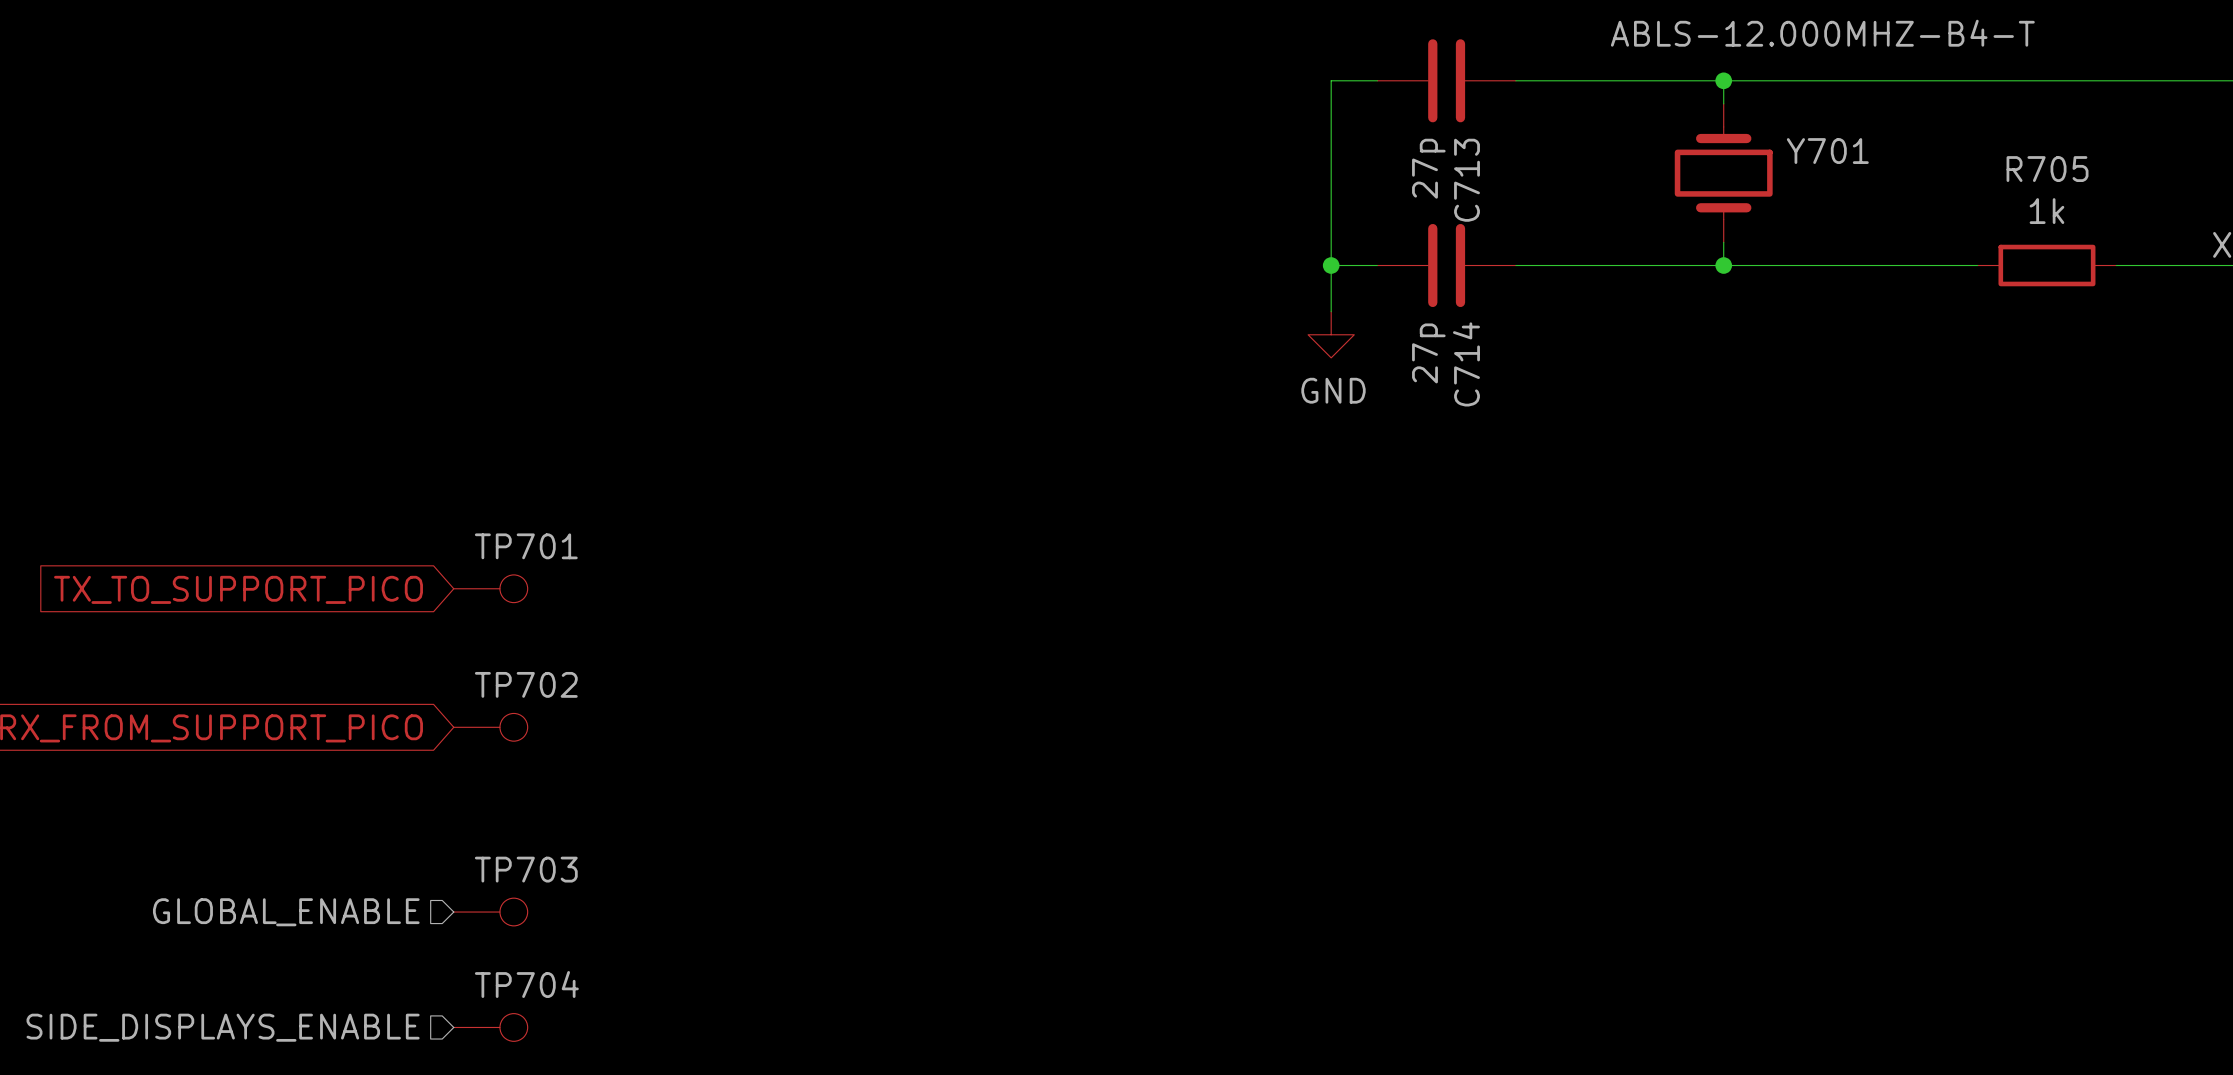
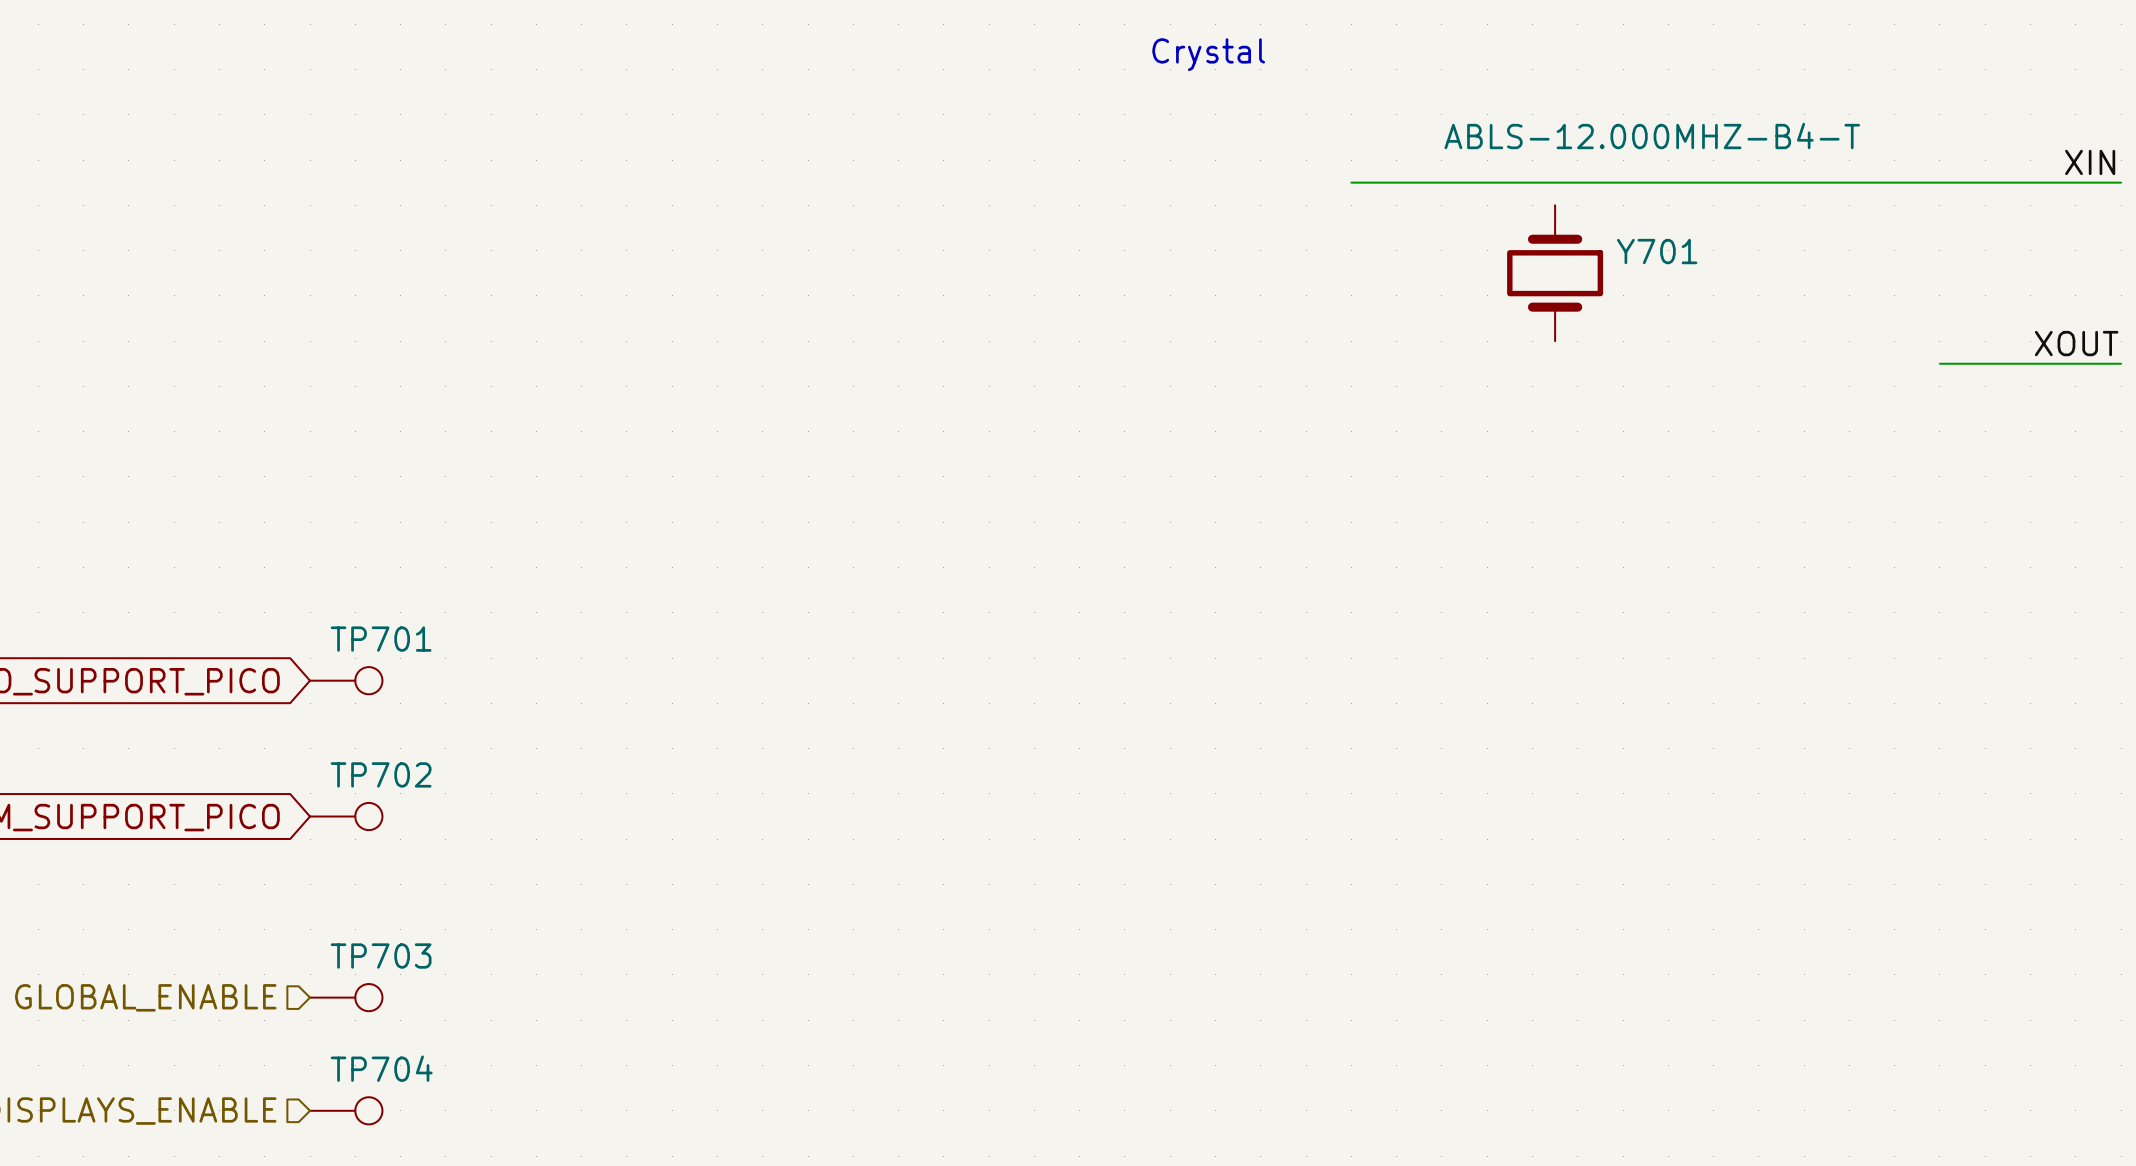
wire: (1377, 80) (1331, 80) (1331, 311) -> none
C713: 27p (1446, 80) -> none
wire: (1723, 80) (1723, 103) -> none
junction: (1723, 80) -> none
wire: (1723, 242) (1723, 265) -> none
wire: (1331, 265) (1377, 265) -> none
junction: (1331, 265) -> none
C714: 27p (1446, 265) -> none
wire: (1515, 265) (1977, 265) -> none
junction: (1723, 265) -> none
R705: 1k (2046, 265) -> none
power symbol: GND (1331, 334) -> none

